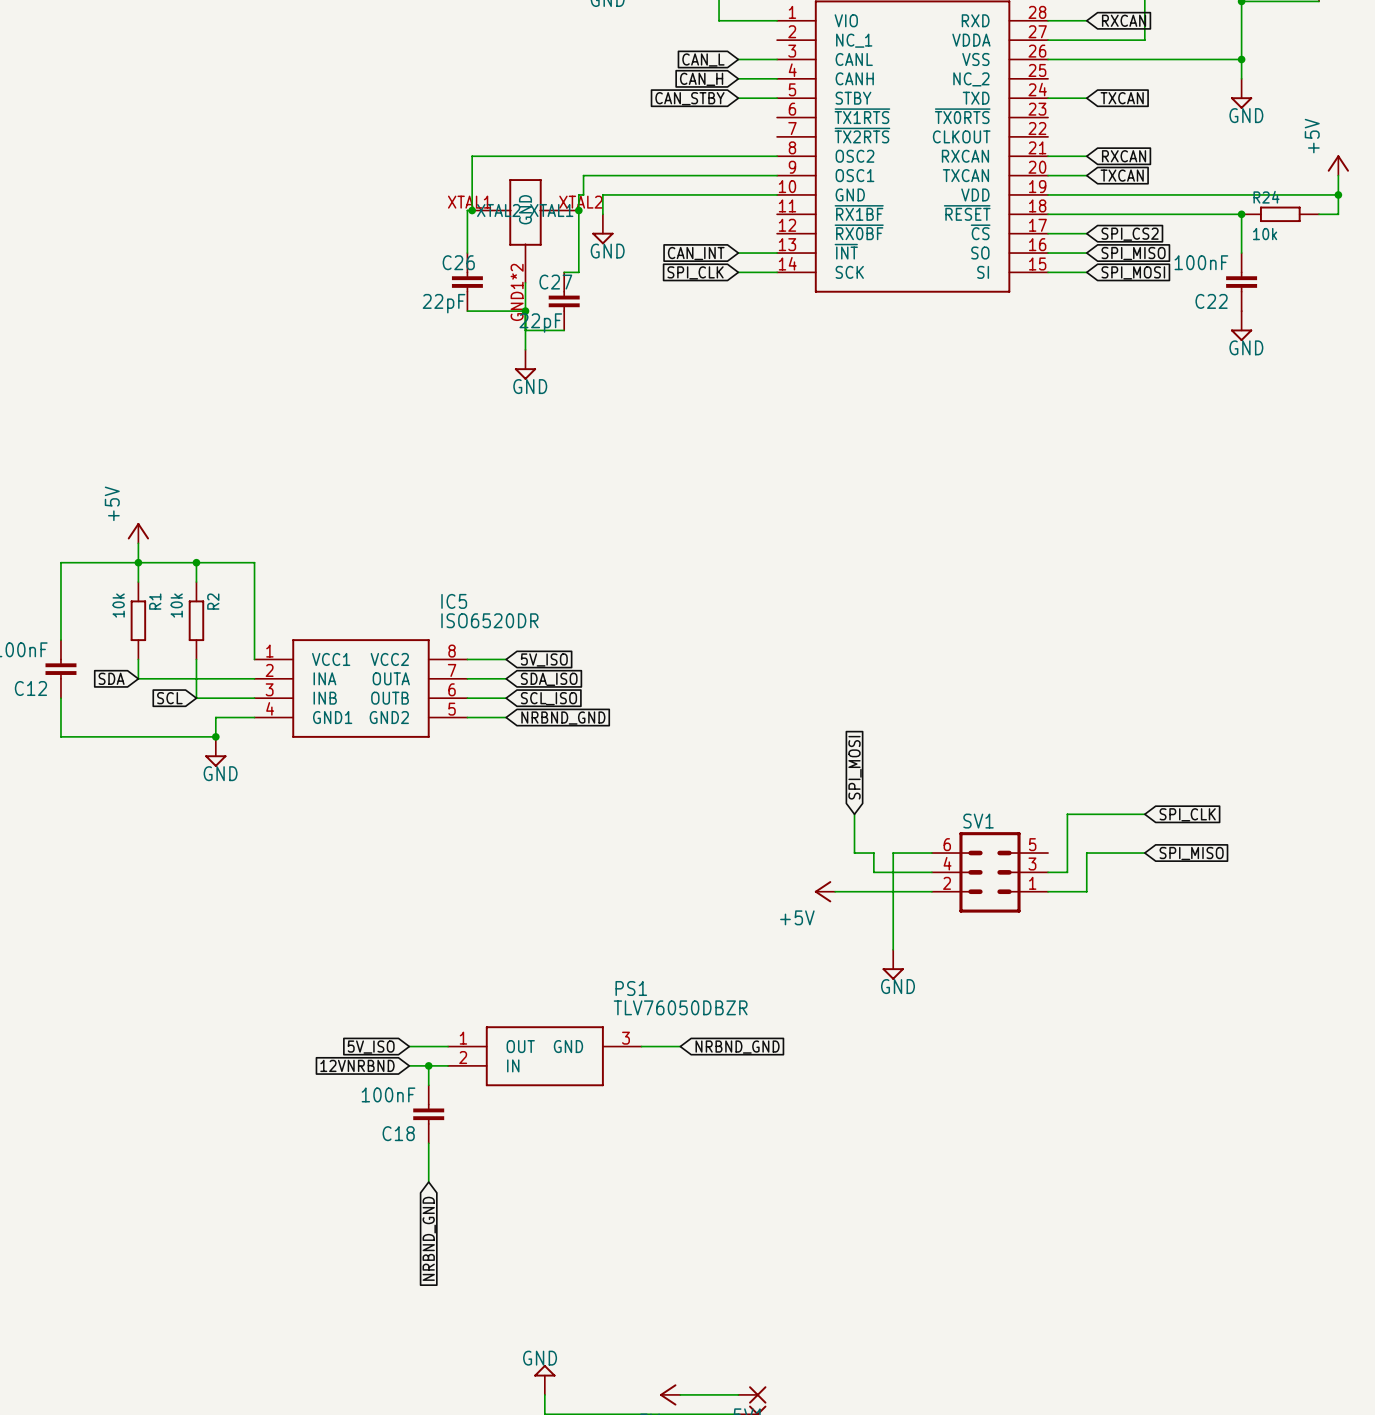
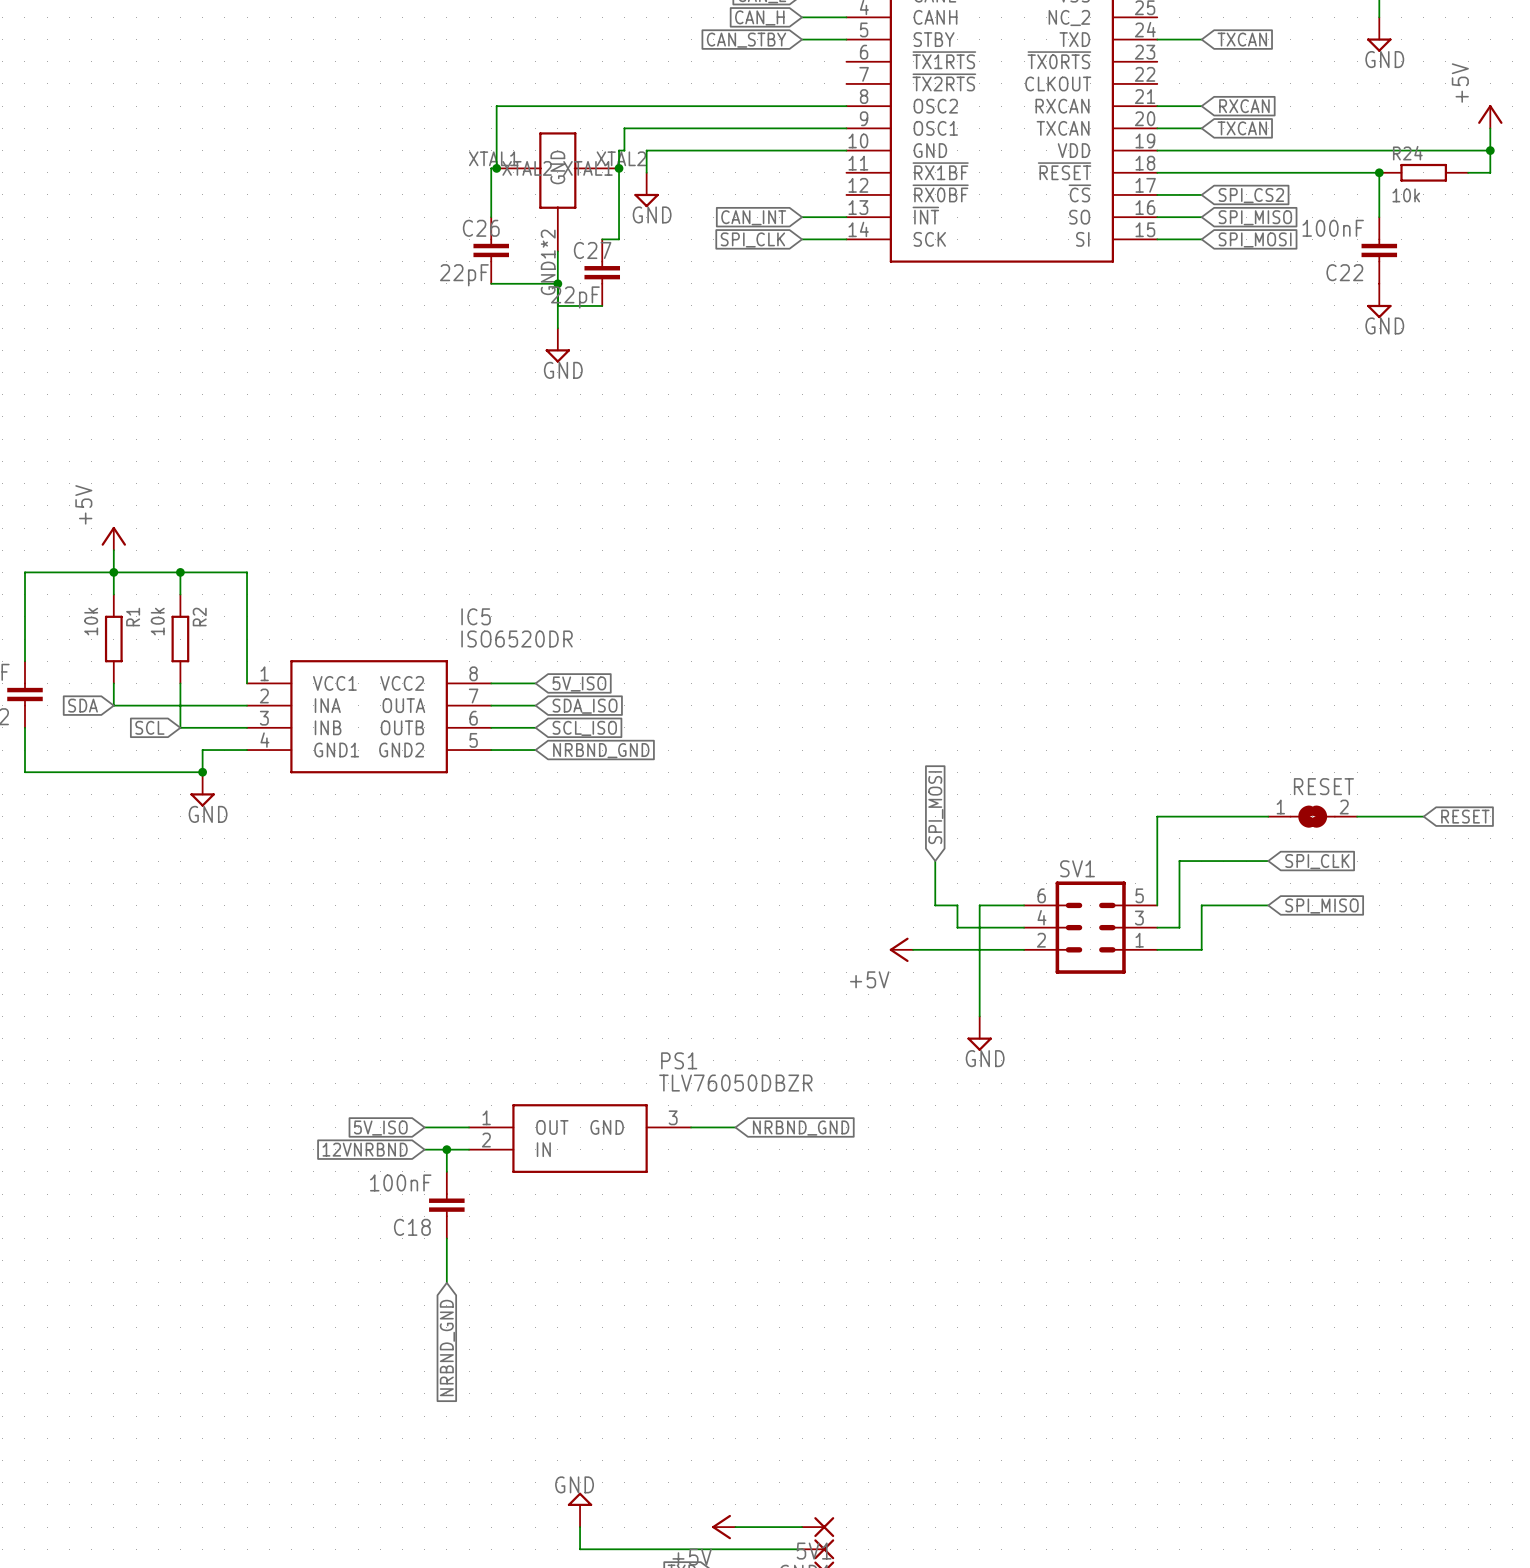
wire: none -> (1268, 816) (1157, 816) (1157, 905)
RESET: none -> (1312, 816)
wire: none -> (1357, 816) (1423, 816)
global label: none -> RESET (1465, 816)

